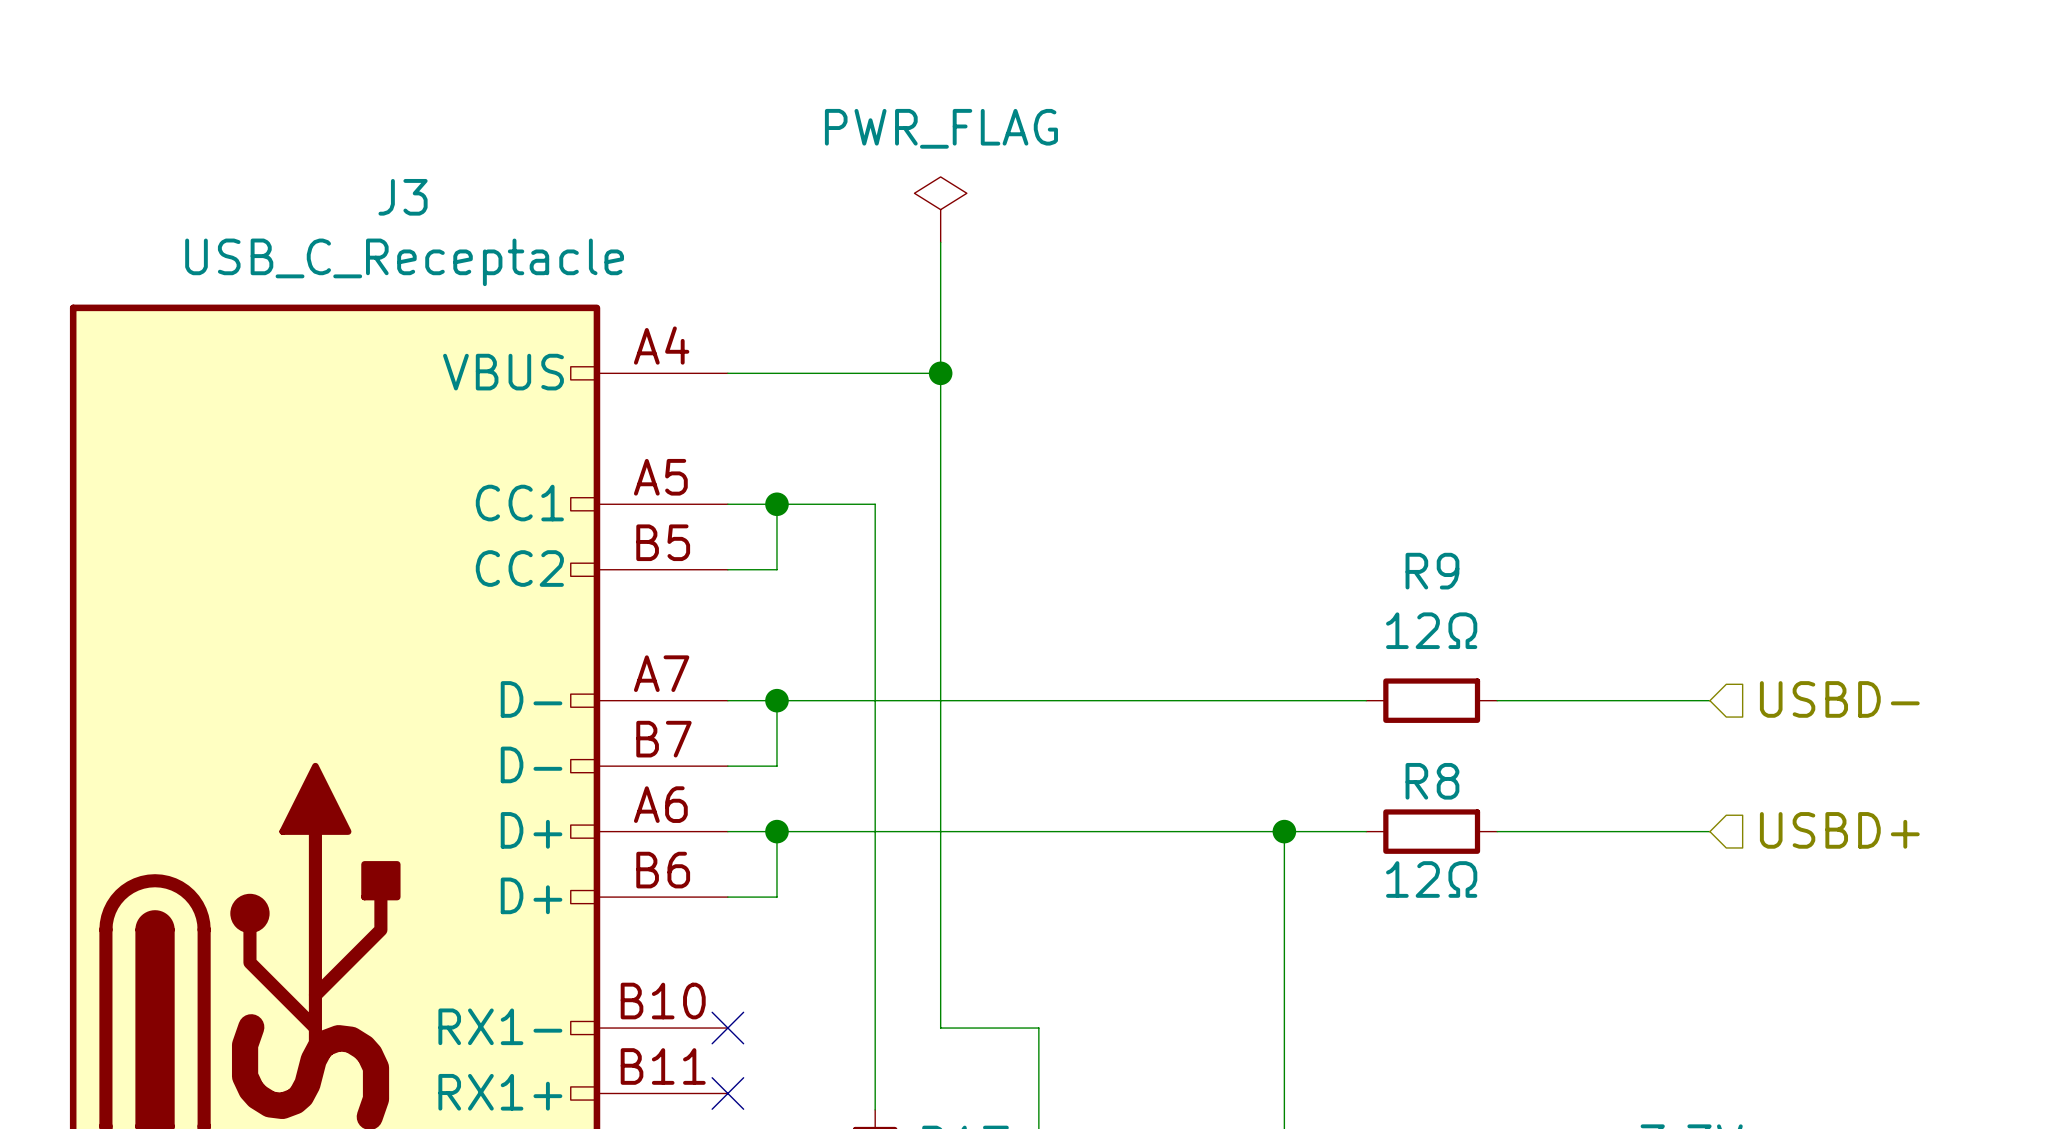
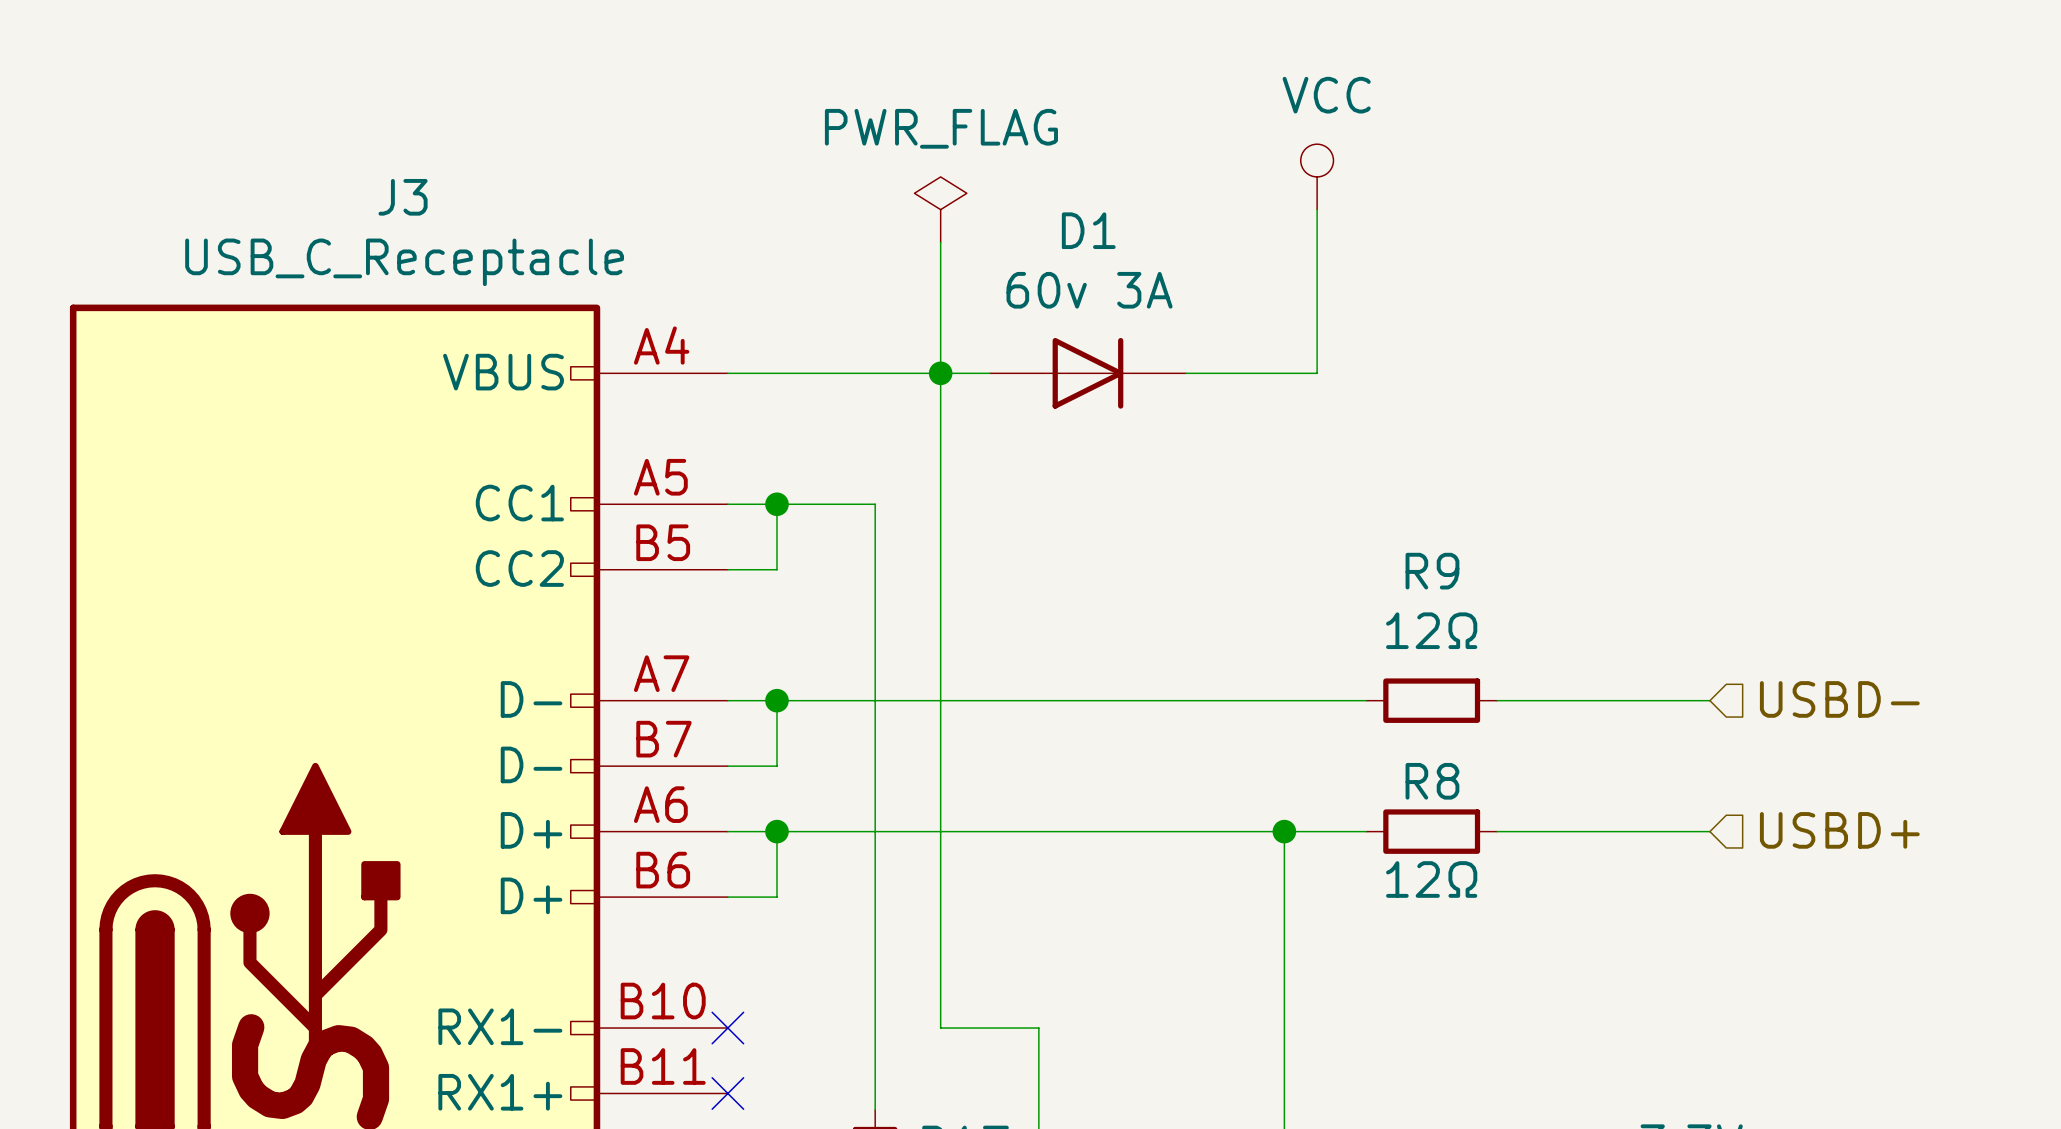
power symbol: none -> VCC (1317, 176)
wire: none -> (1317, 209) (1317, 373) (1186, 373)
wire: none -> (940, 373) (989, 373)
D1: none -> 60v 3A (1087, 373)

